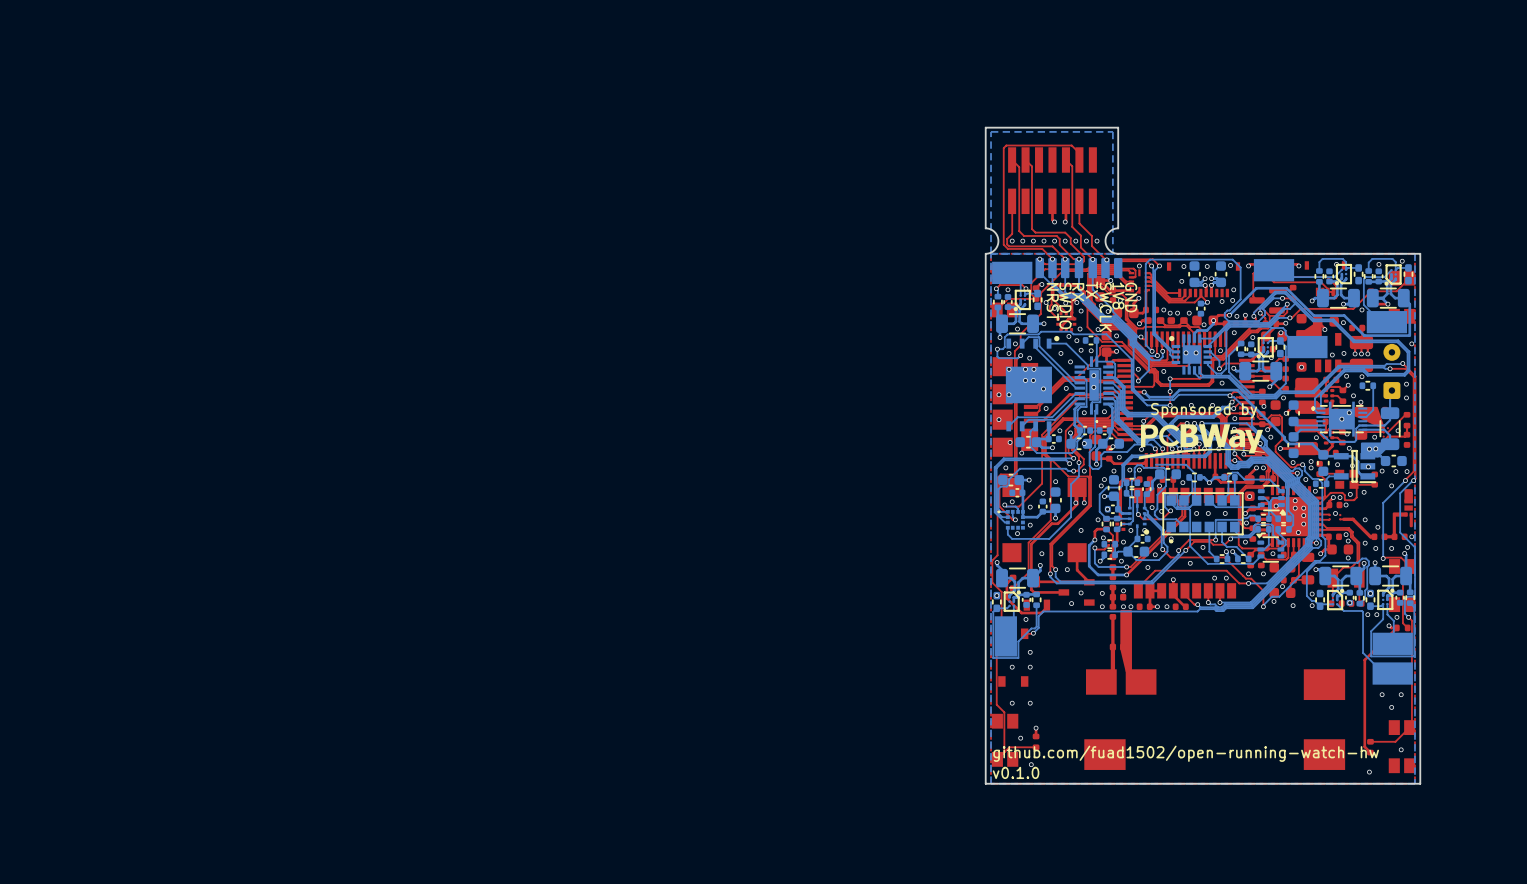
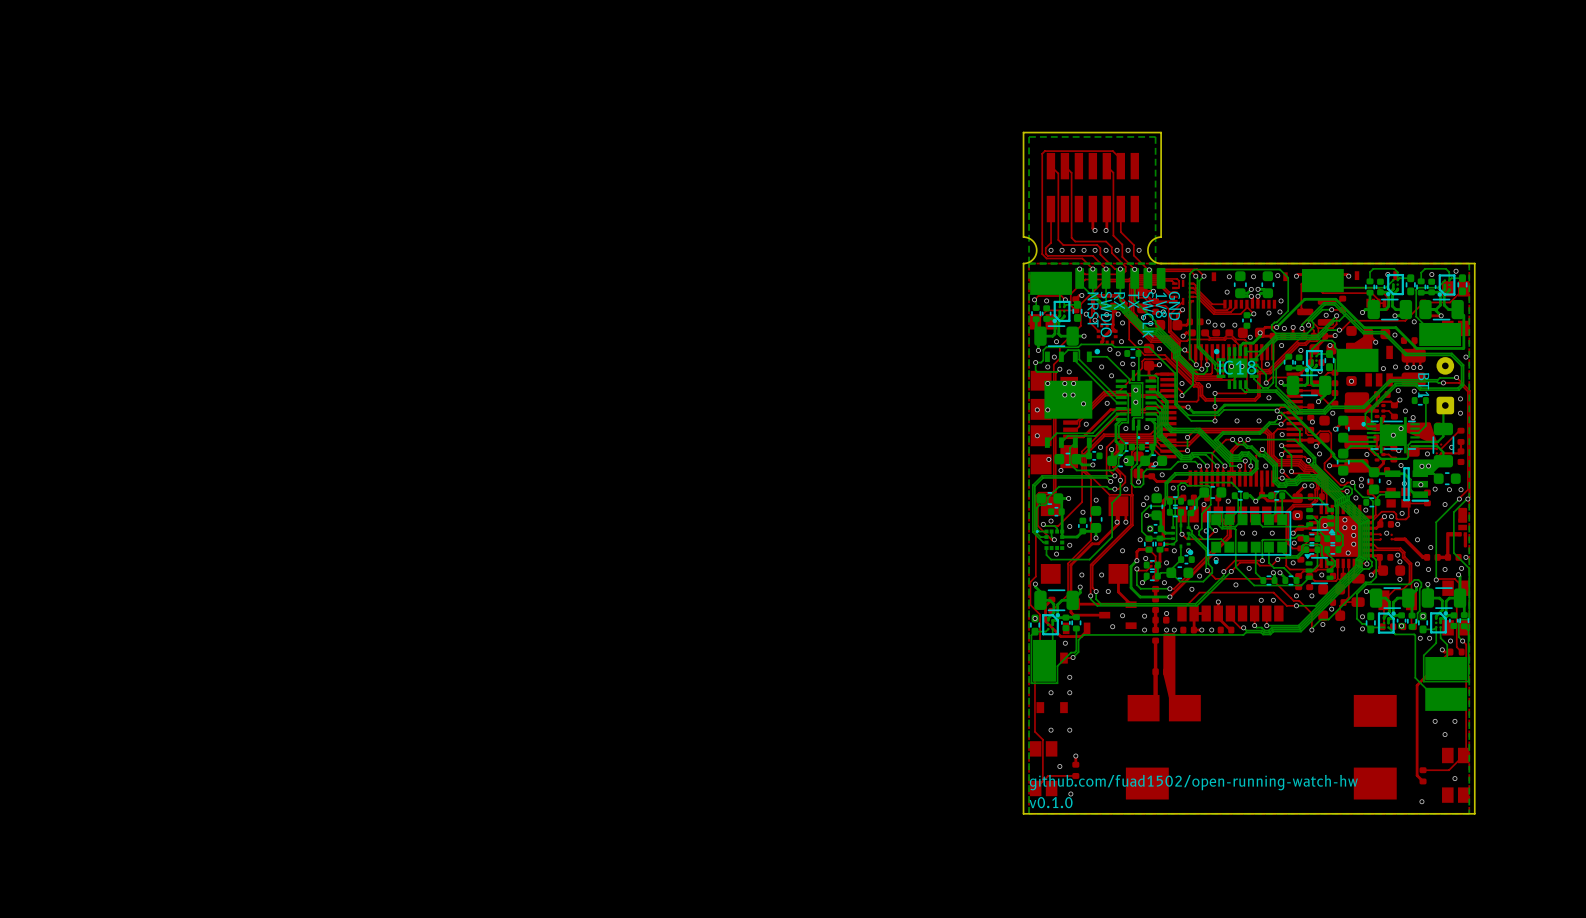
IC18 name: none -> IC18 (1237, 367)
BT1 name: none -> BT1 (1423, 385)
text: Sponsored by (1204, 410) -> none
drawing: [1138, 424, 1266, 460] -> none

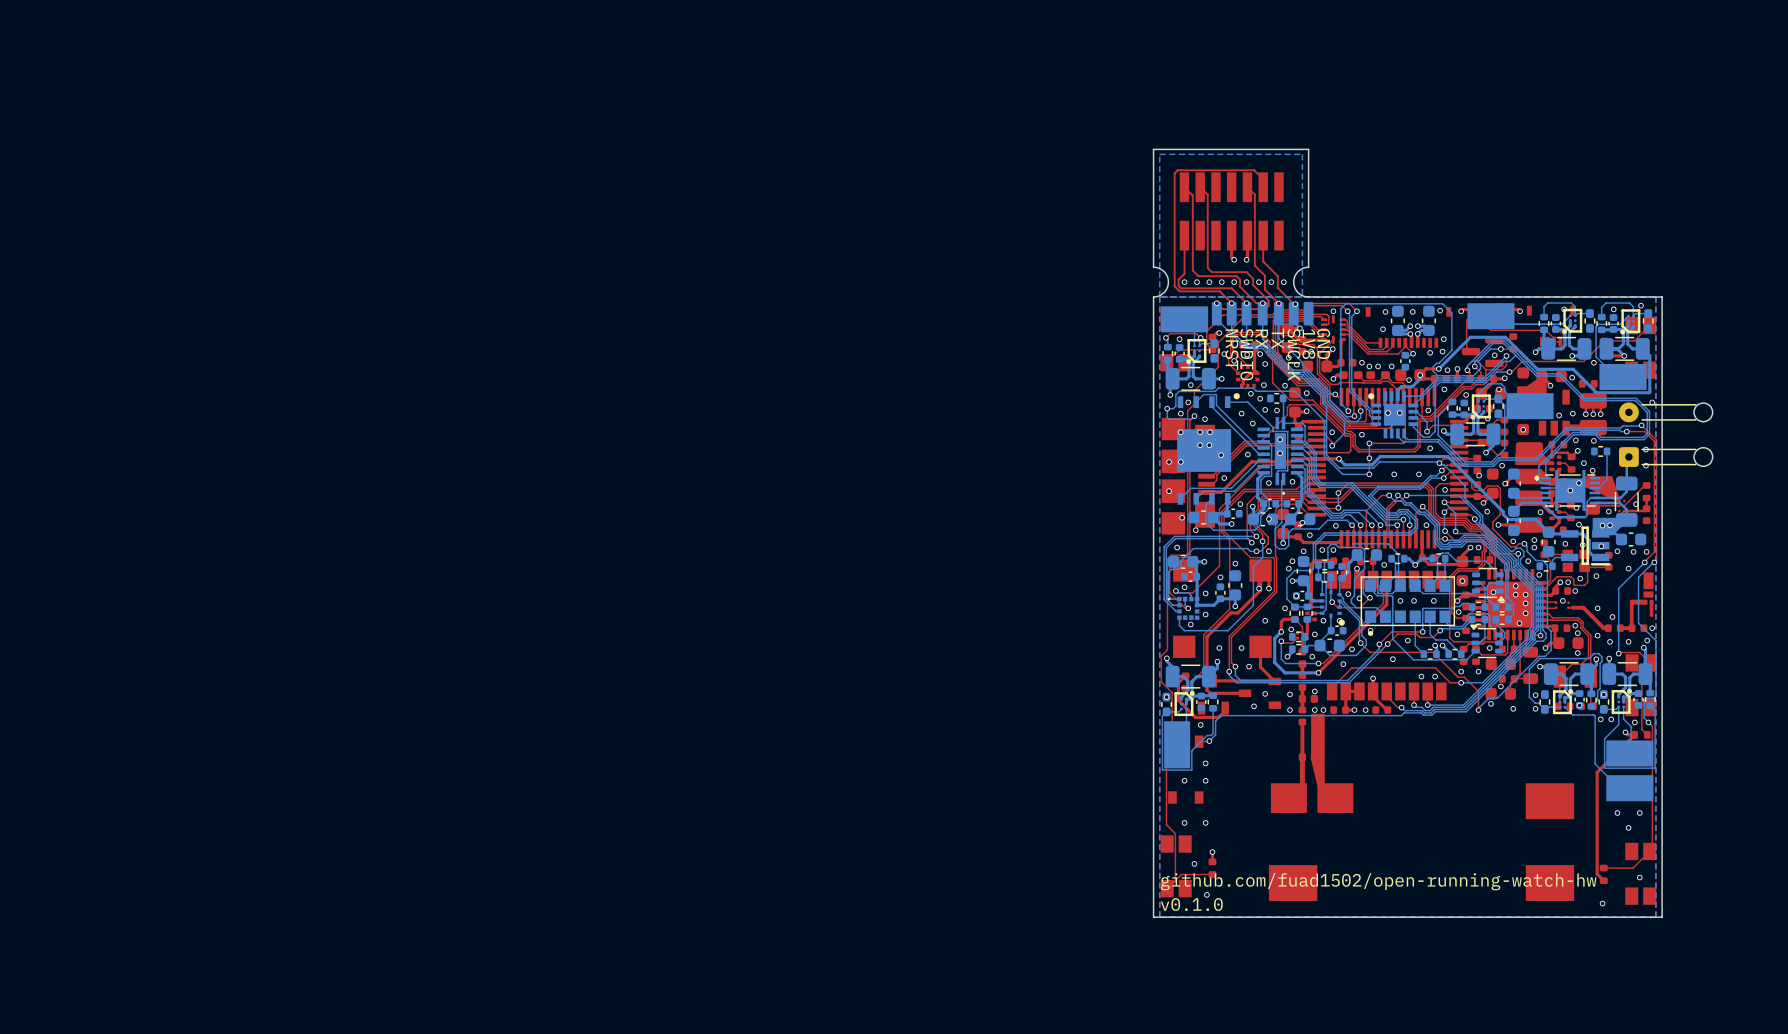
IC18 name: IC18 (1237, 367) -> none
BT1: (1445, 385) -> none
part: none -> (1665, 434)

